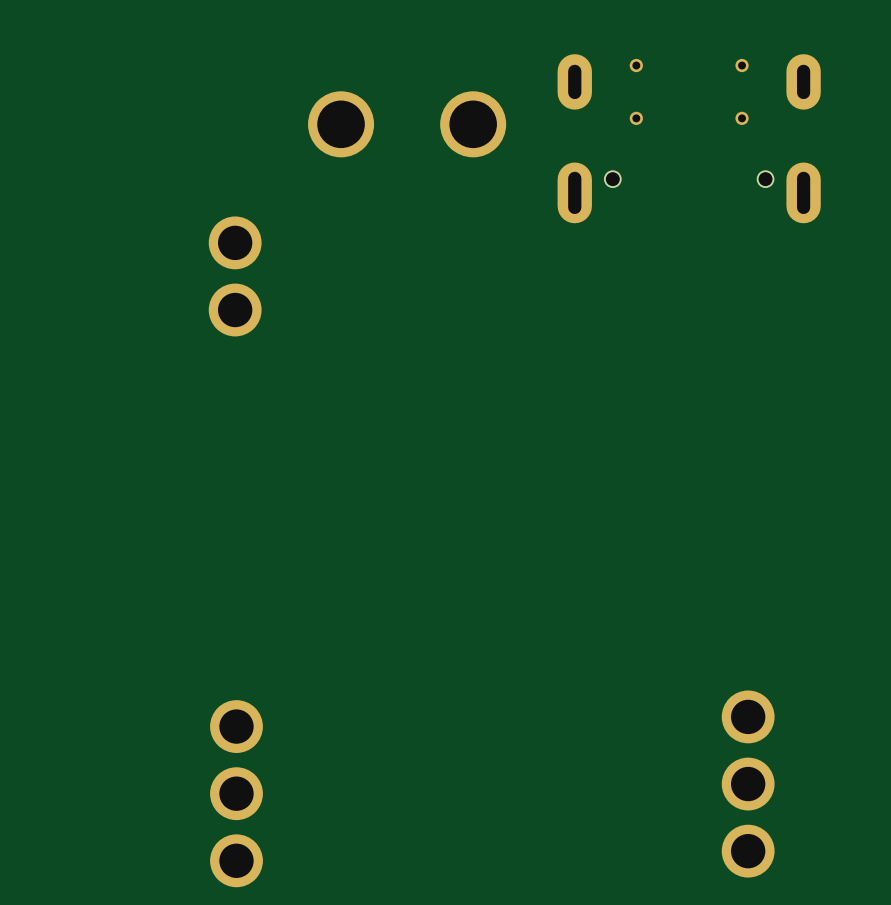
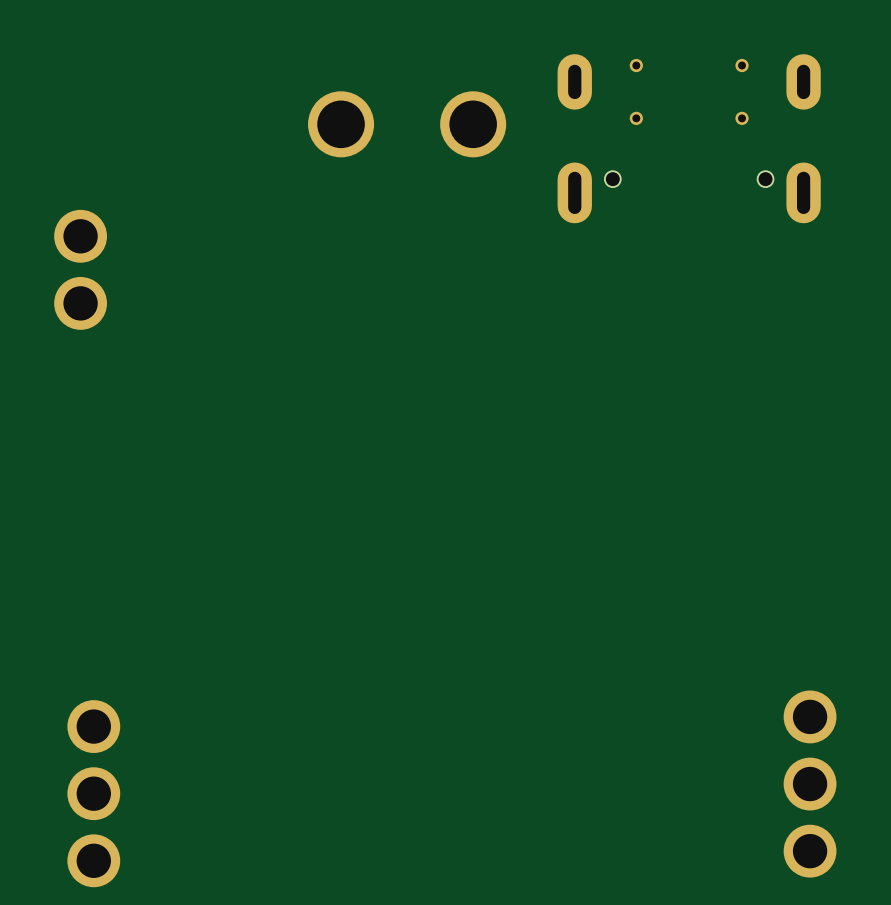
part position: (235, 276) -> (80, 269)
part position: (748, 784) -> (810, 784)
part: none -> (93, 793)
part: (236, 793) -> none

